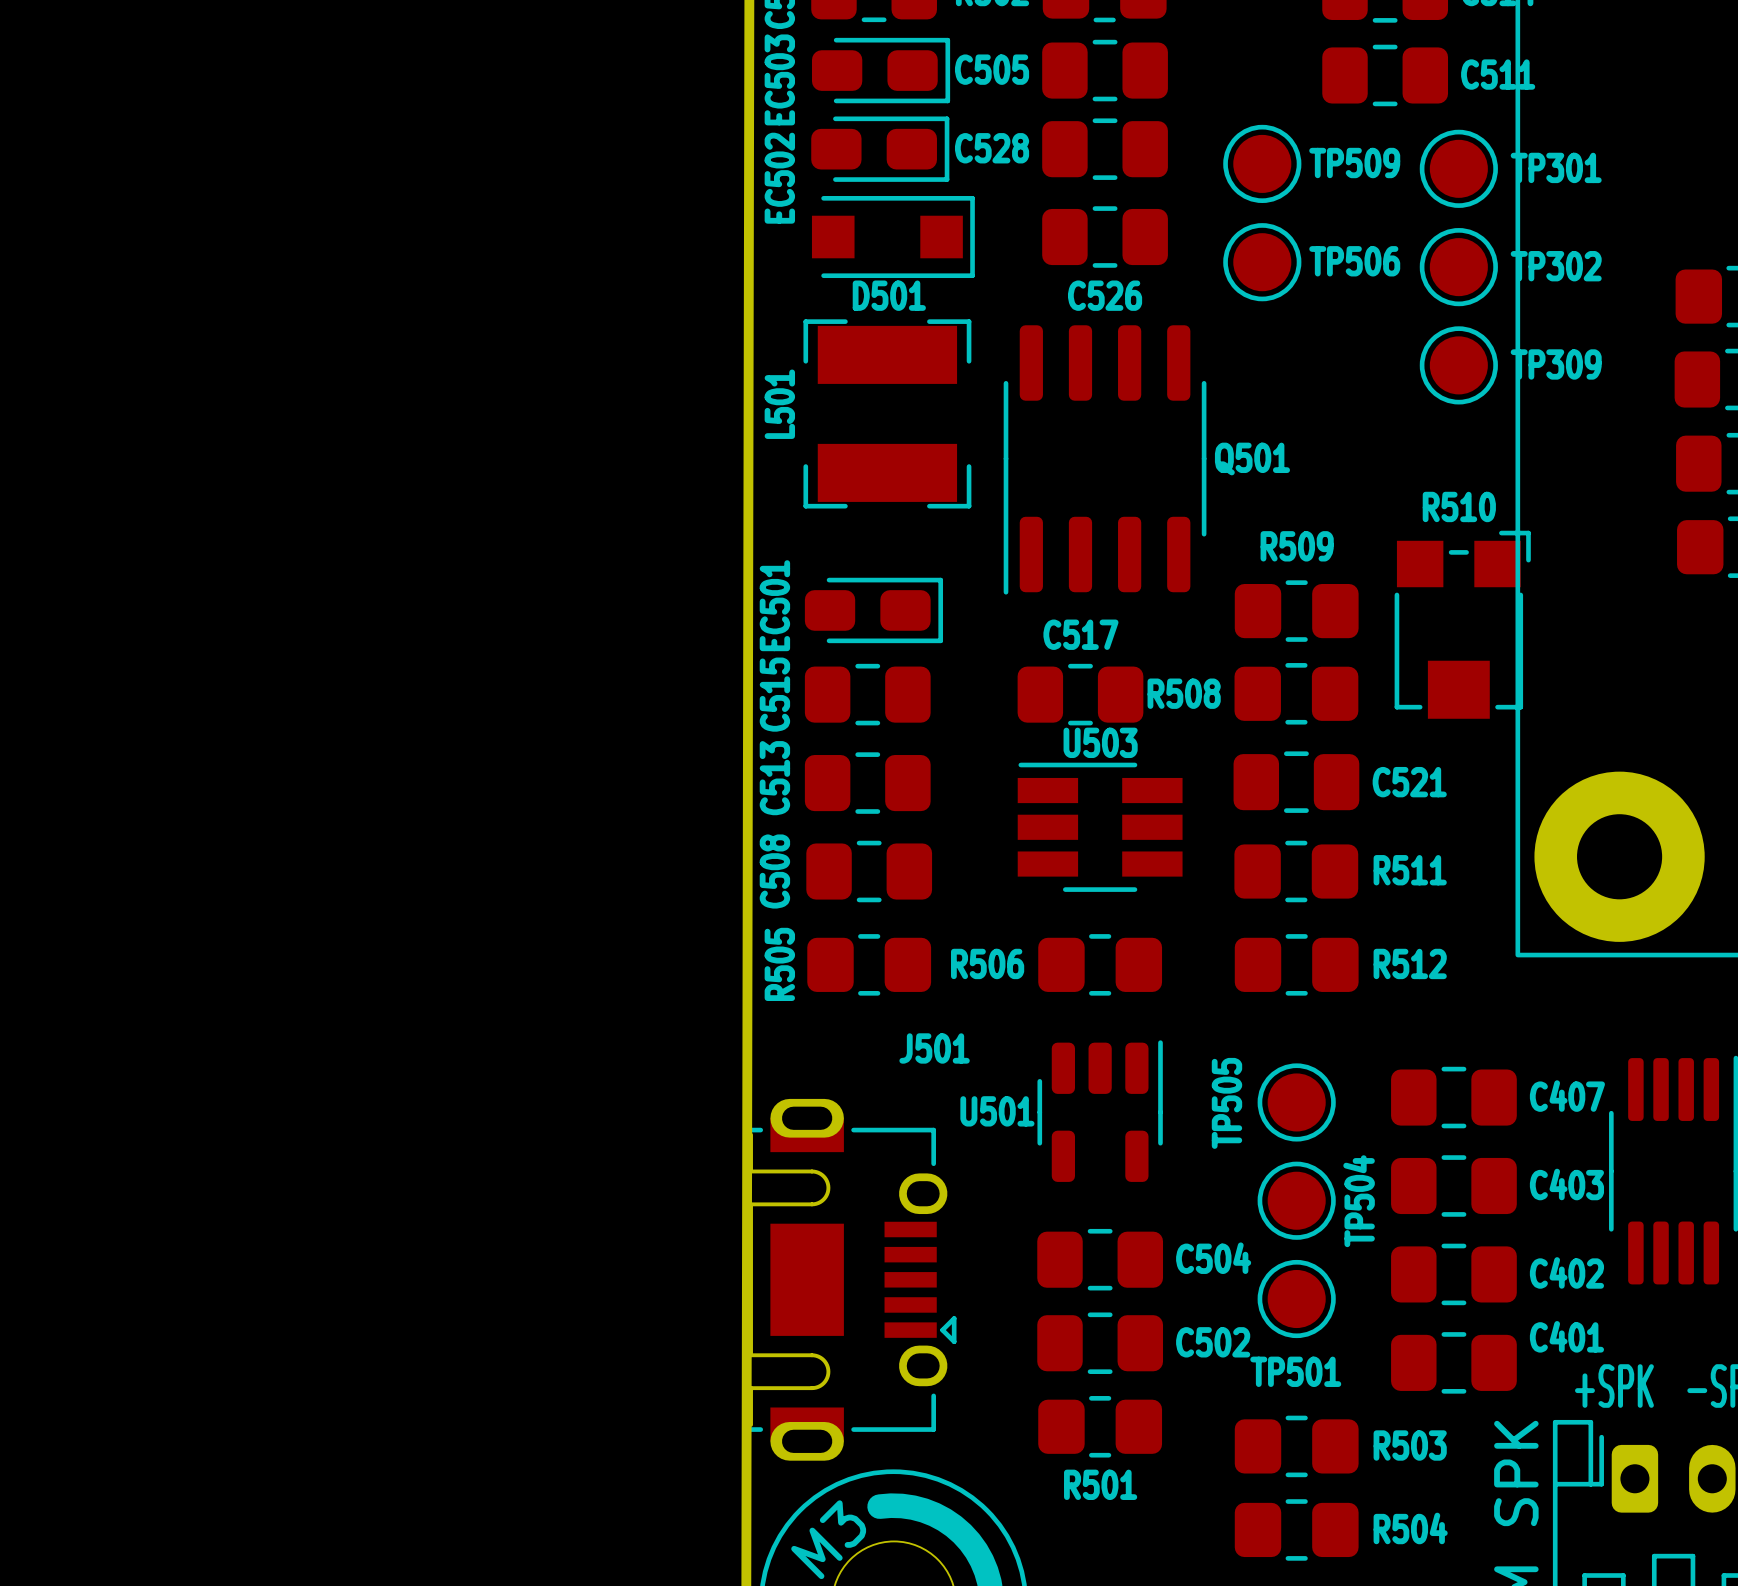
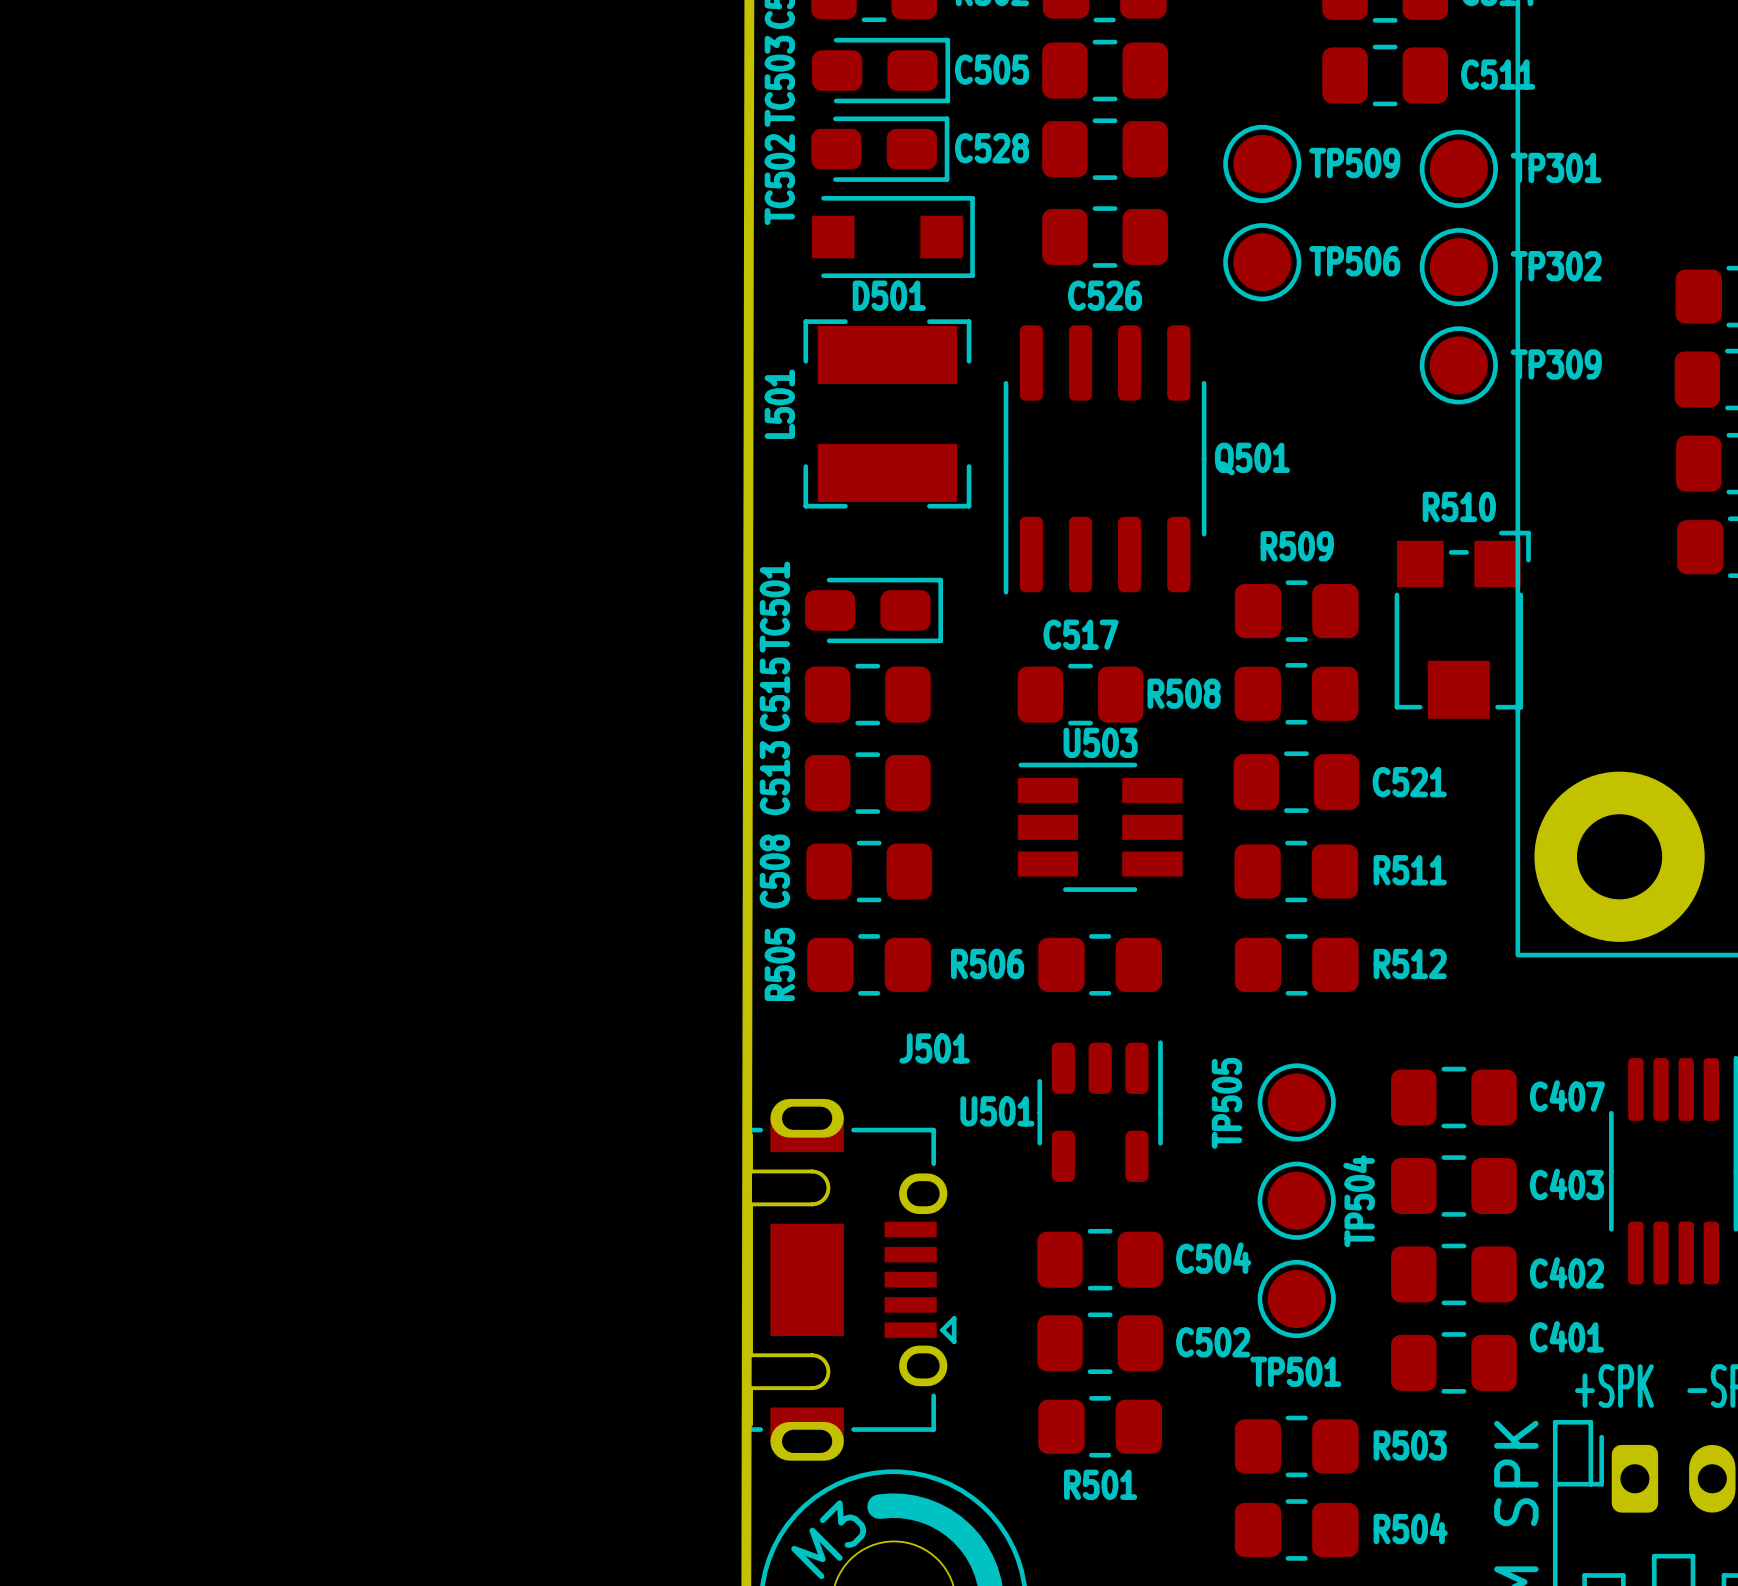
EC503 name: EC503 (779, 79) -> TC503 (779, 81)
EC502 name: EC502 (779, 178) -> TC502 (779, 179)
EC501 name: EC501 (774, 605) -> TC501 (774, 607)

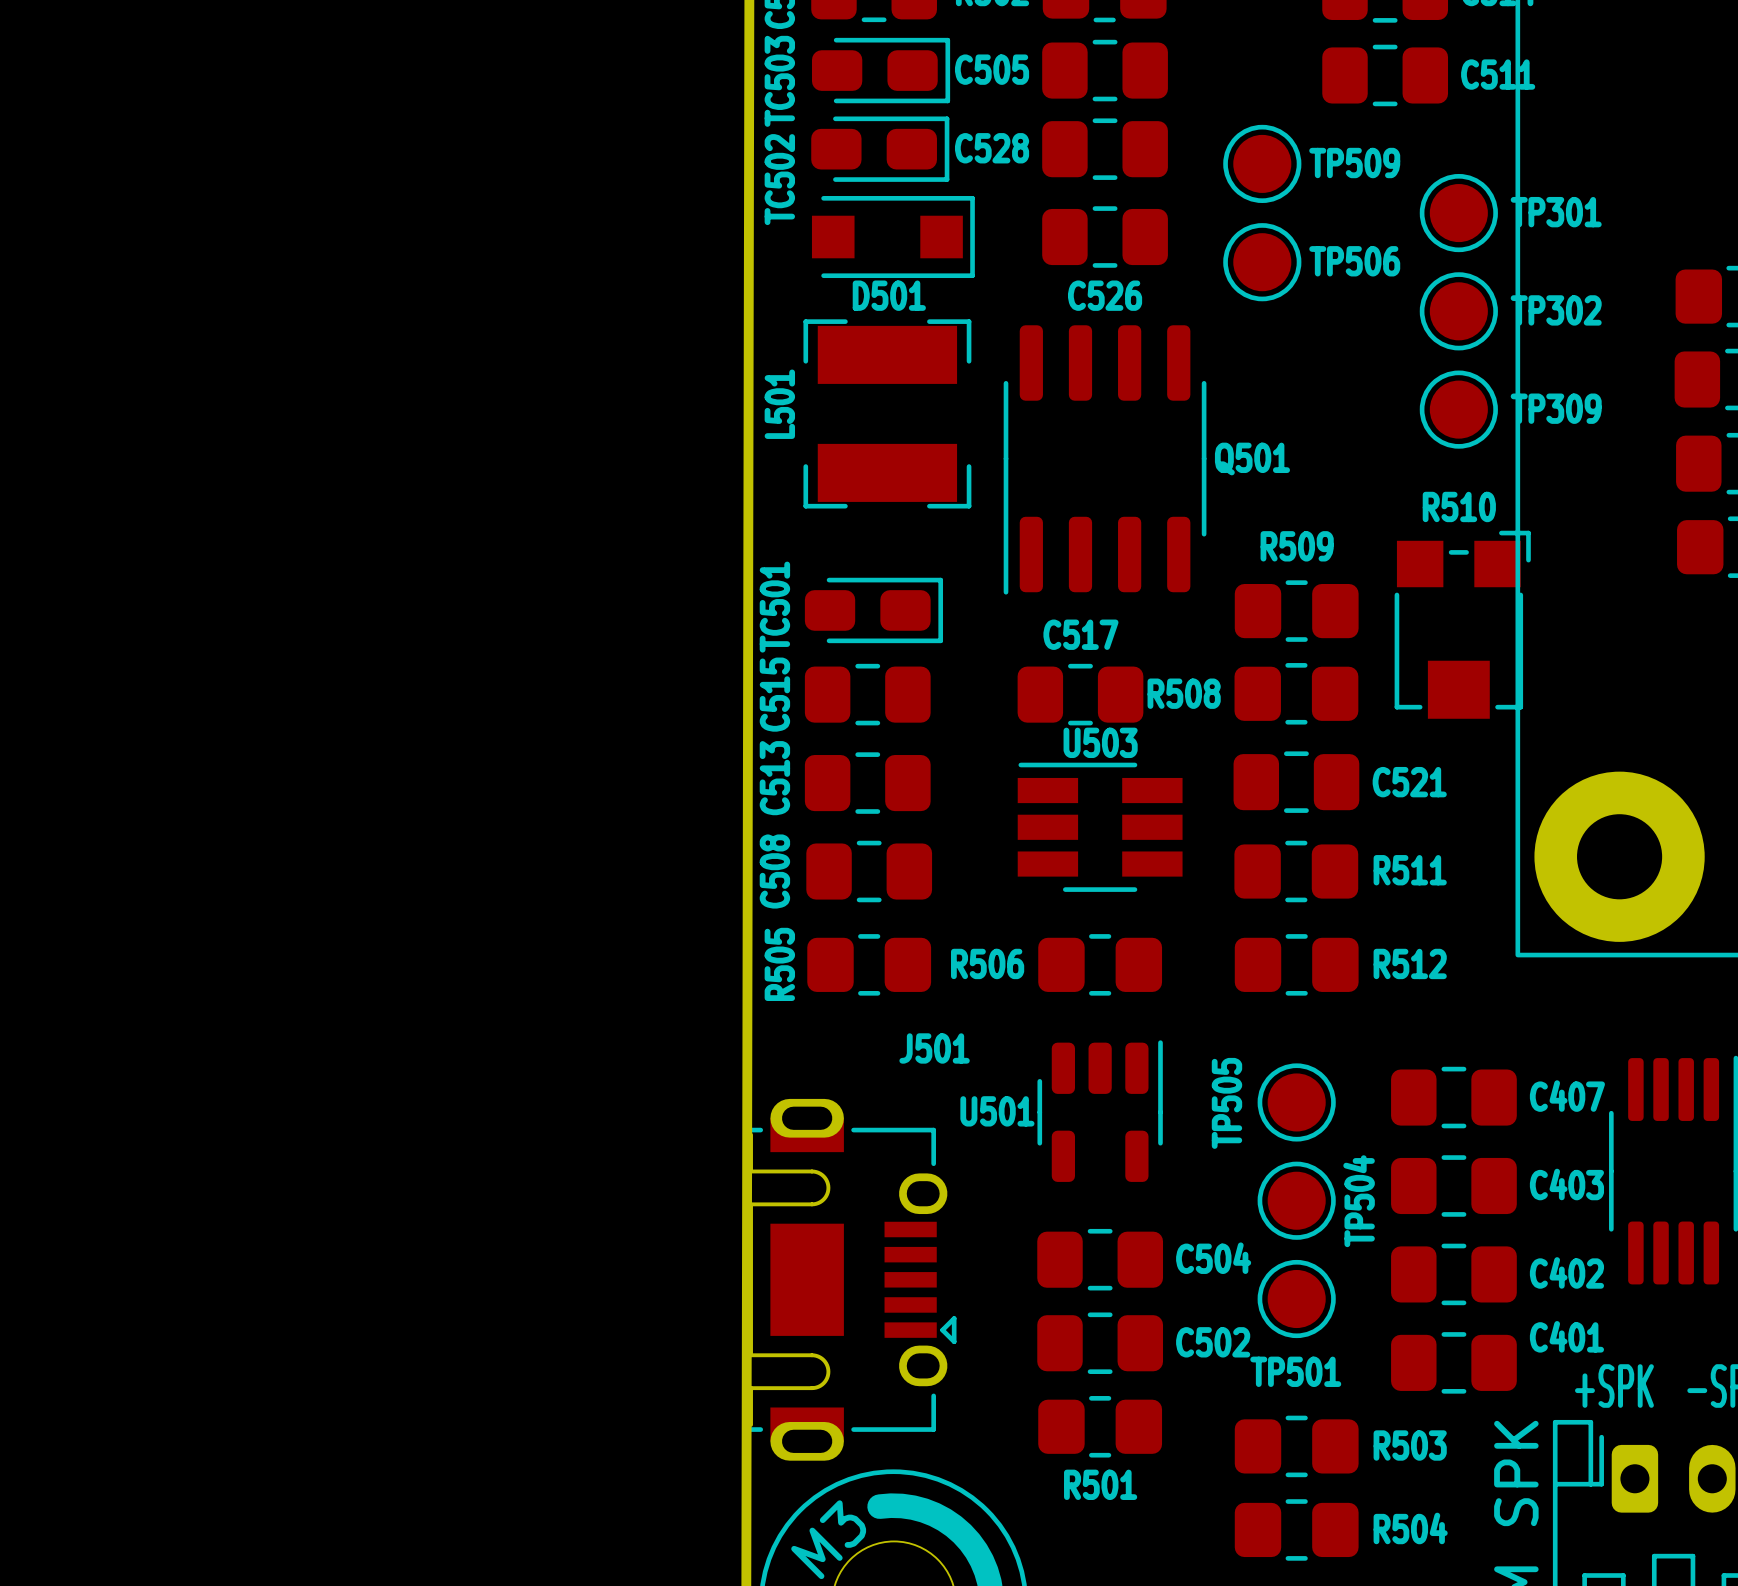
TP301 position: (1458, 168) -> (1458, 213)
TP302 position: (1458, 267) -> (1458, 311)
TP309 position: (1458, 365) -> (1458, 409)

